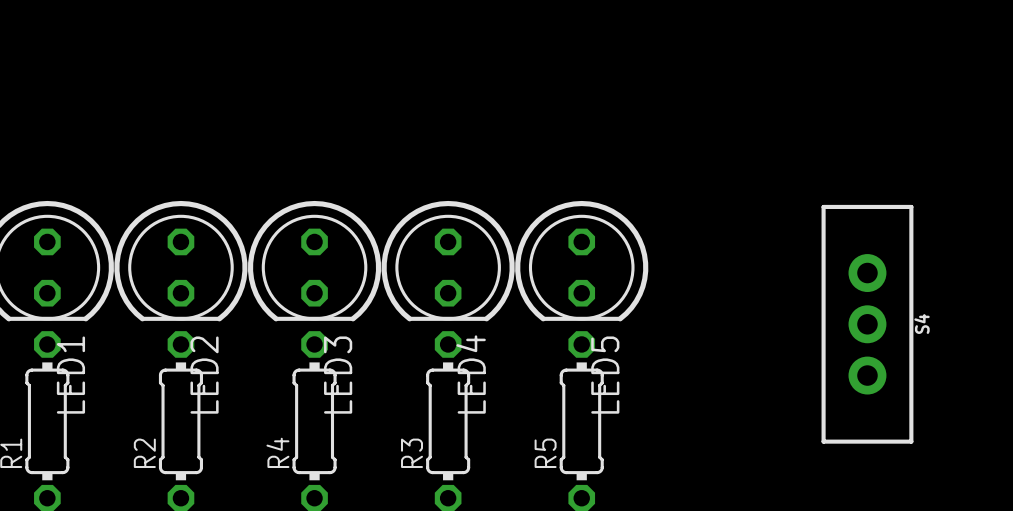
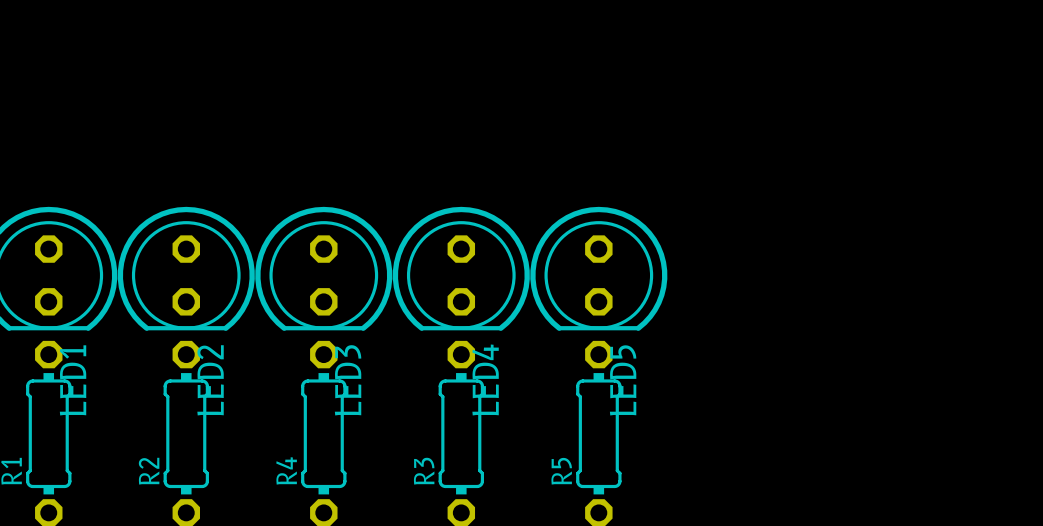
S4: (867, 324) -> none

